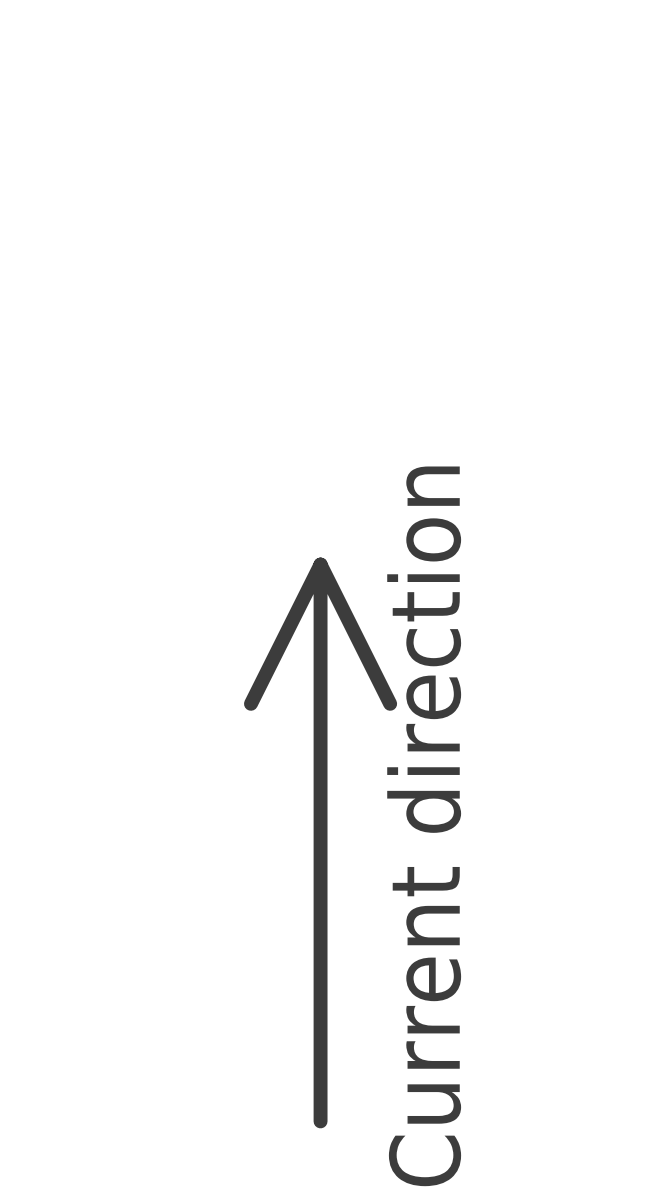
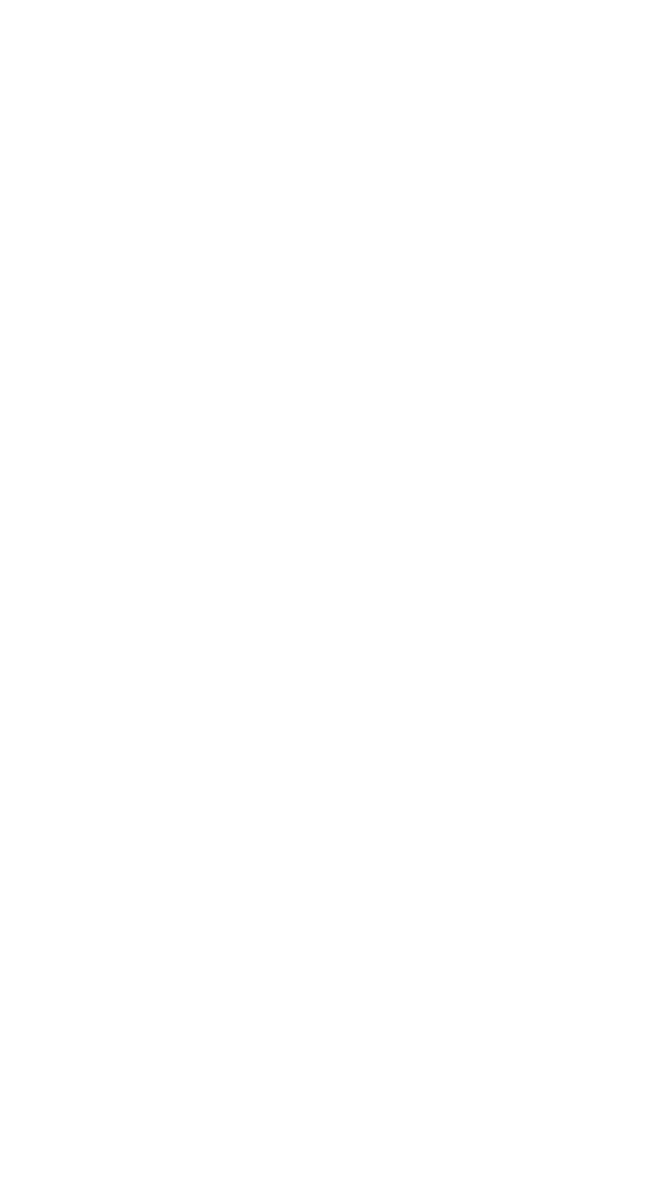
line: (320, 564) (320, 1121) -> none
line: (320, 564) (250, 703) -> none
line: (320, 564) (390, 703) -> none
text: Current direction (424, 826) -> none

